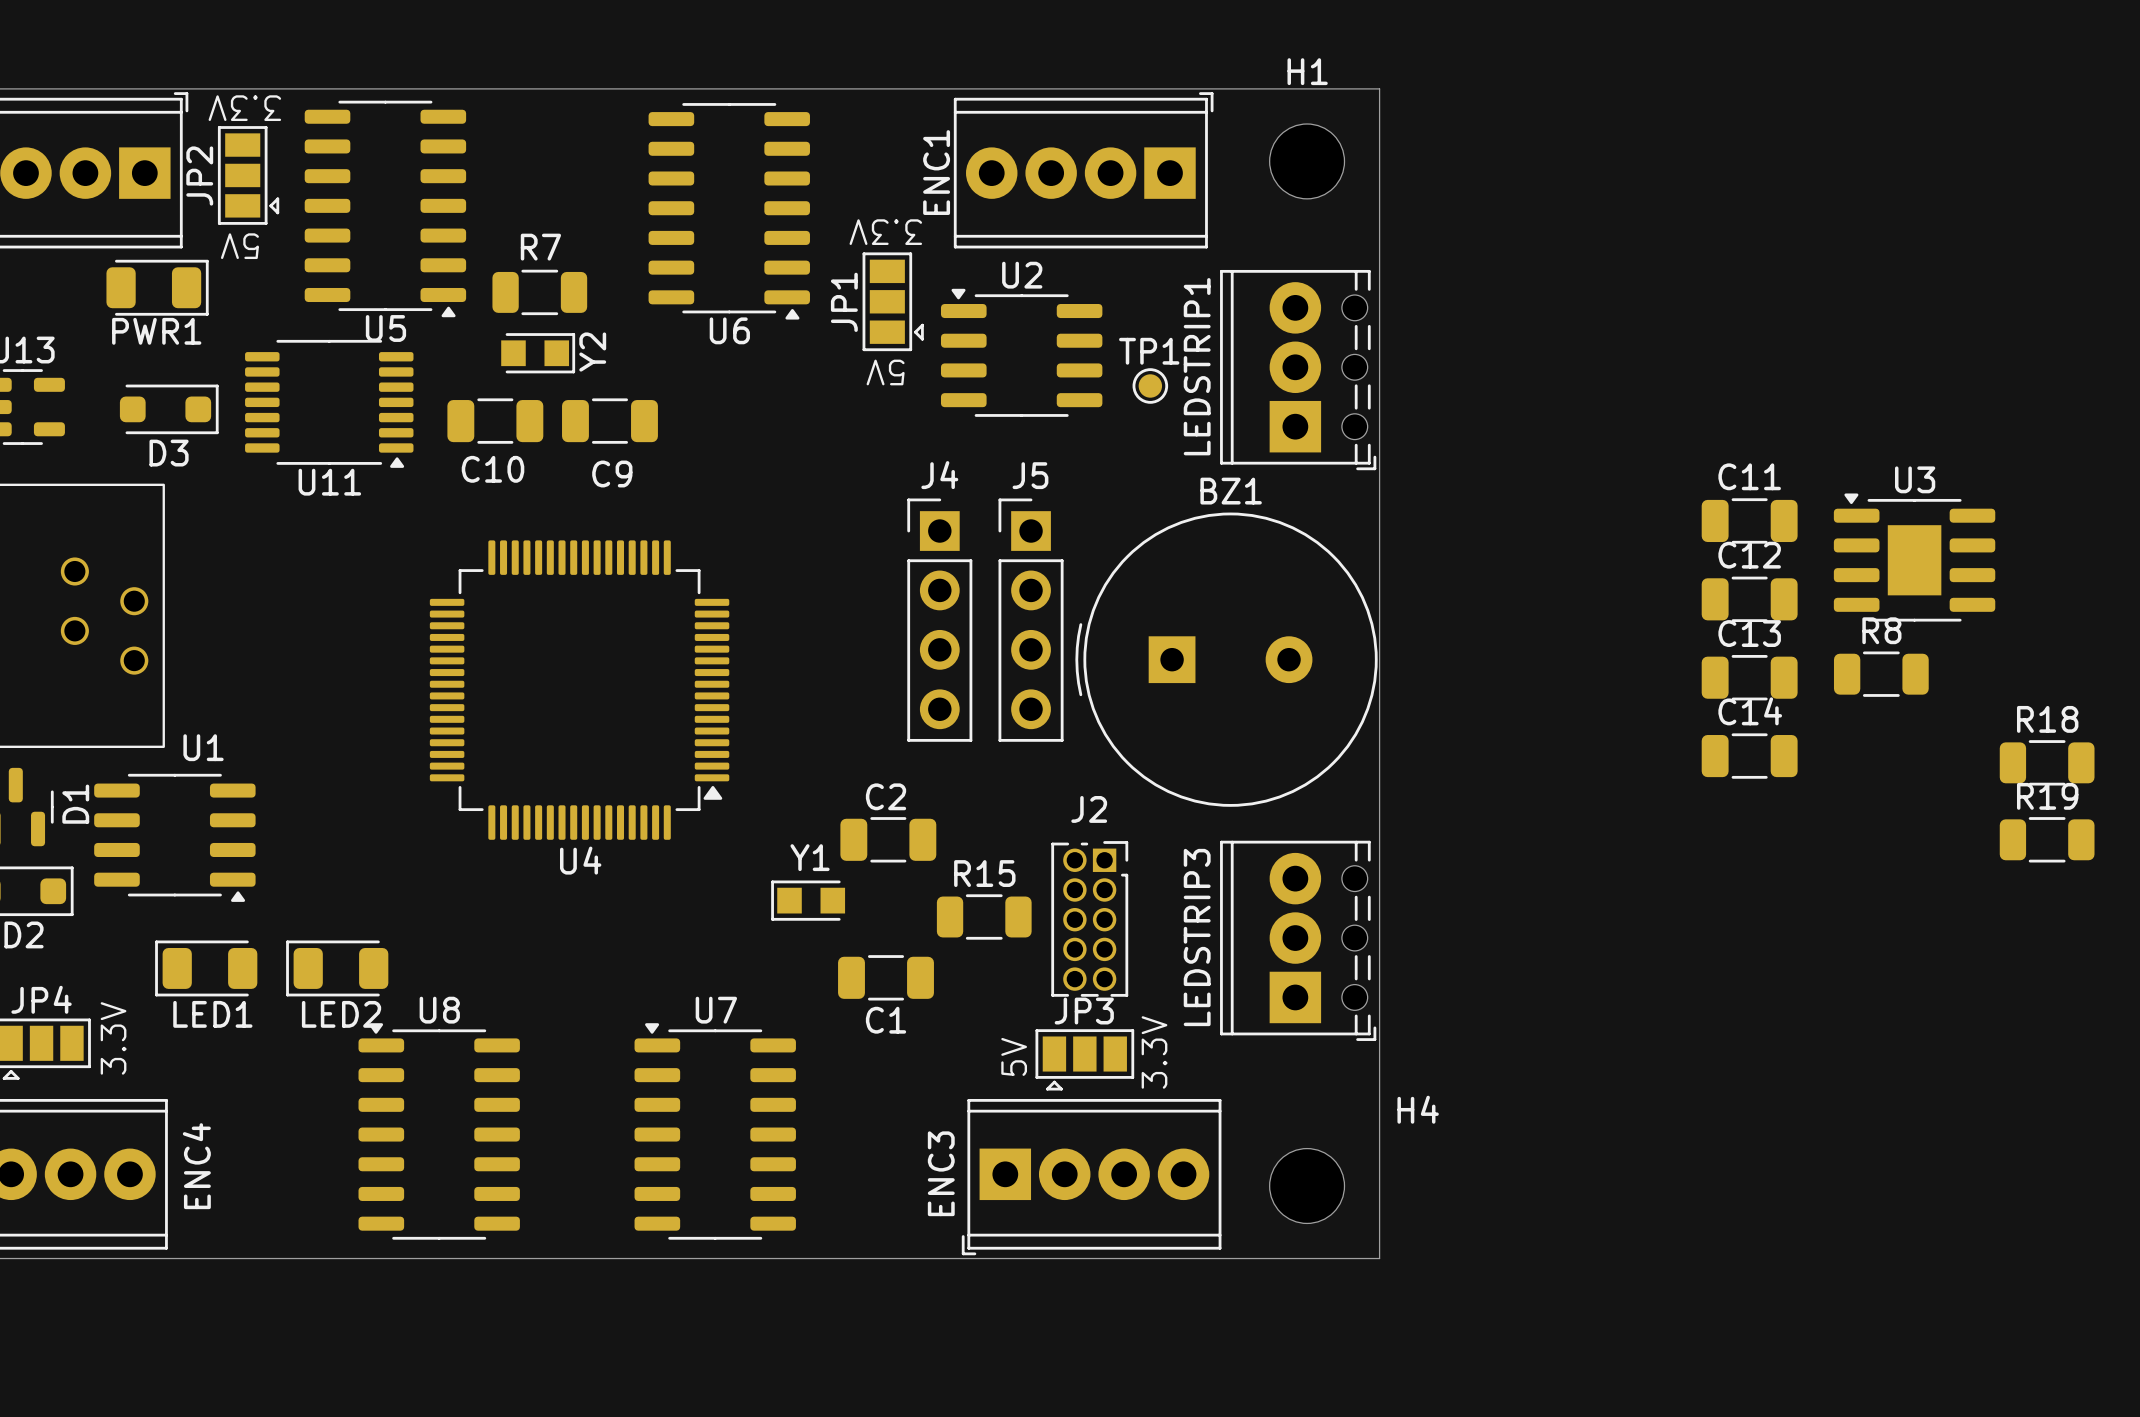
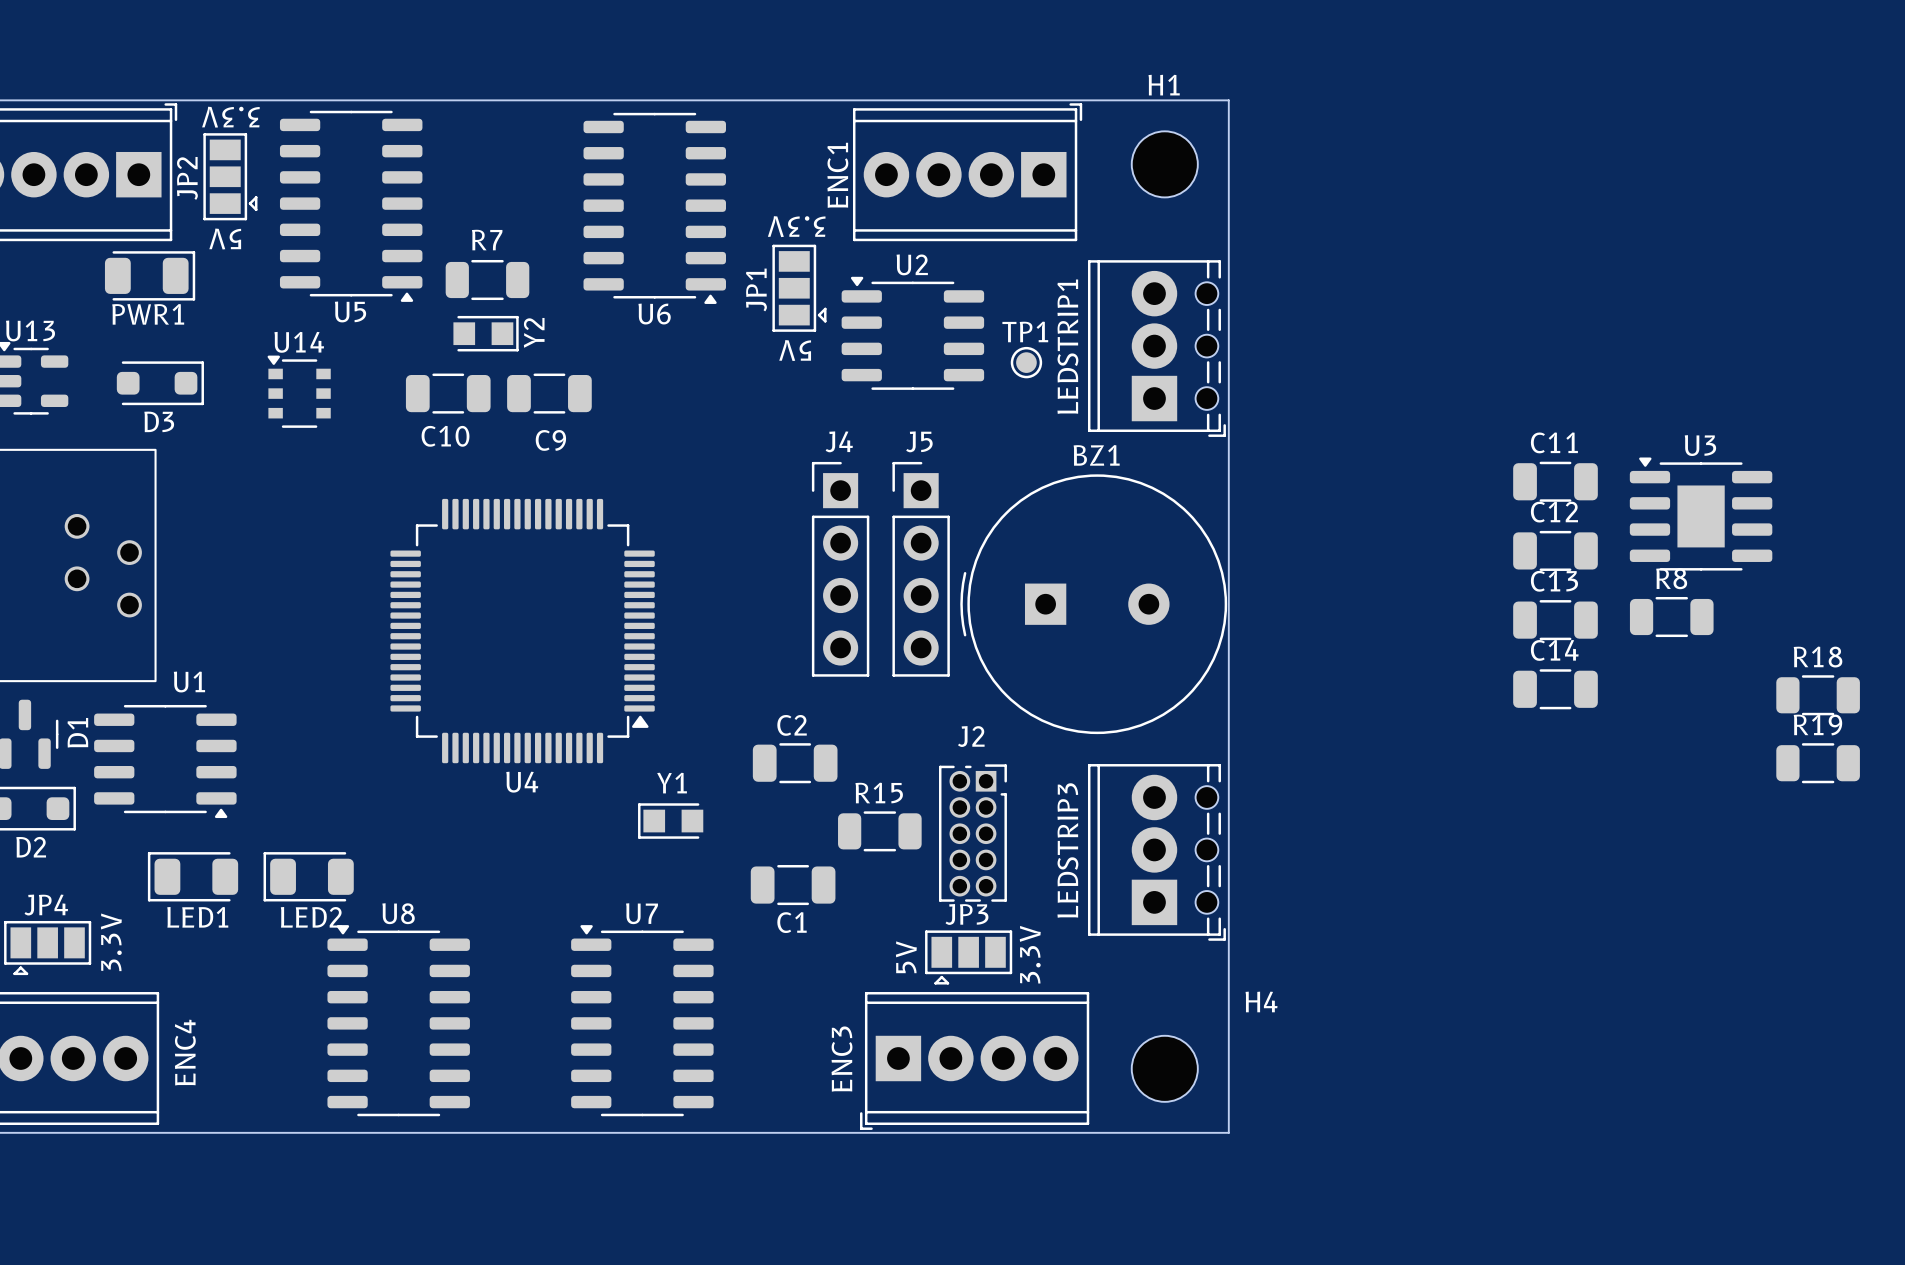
U11: (329, 403) -> none
U14: none -> (299, 391)
Y1 position: (808, 900) -> (670, 821)

